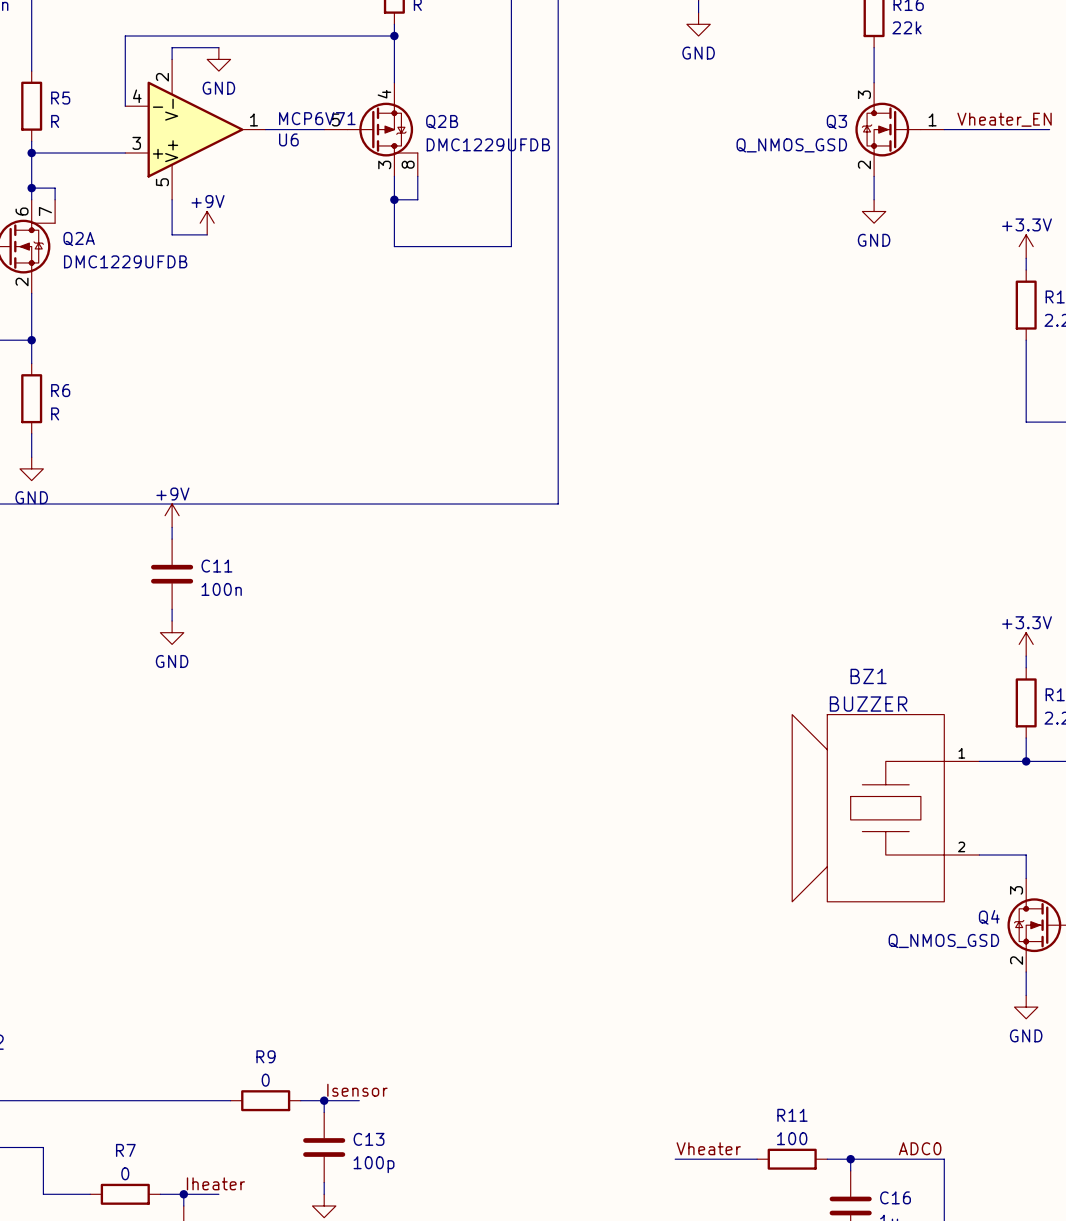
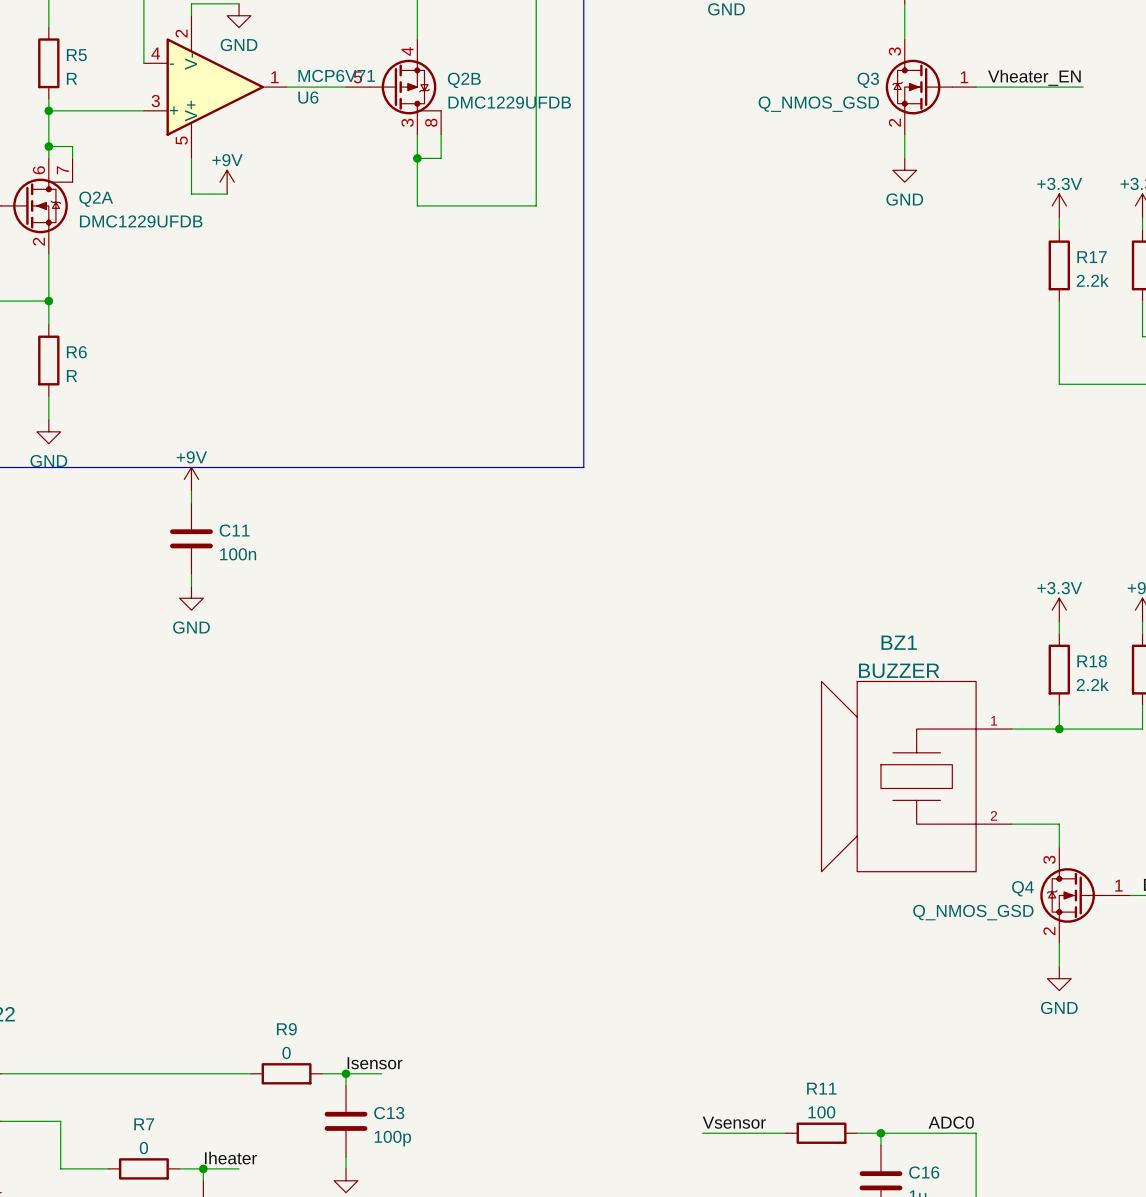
label: Vheater (708, 1148) -> Vsensor (734, 1122)

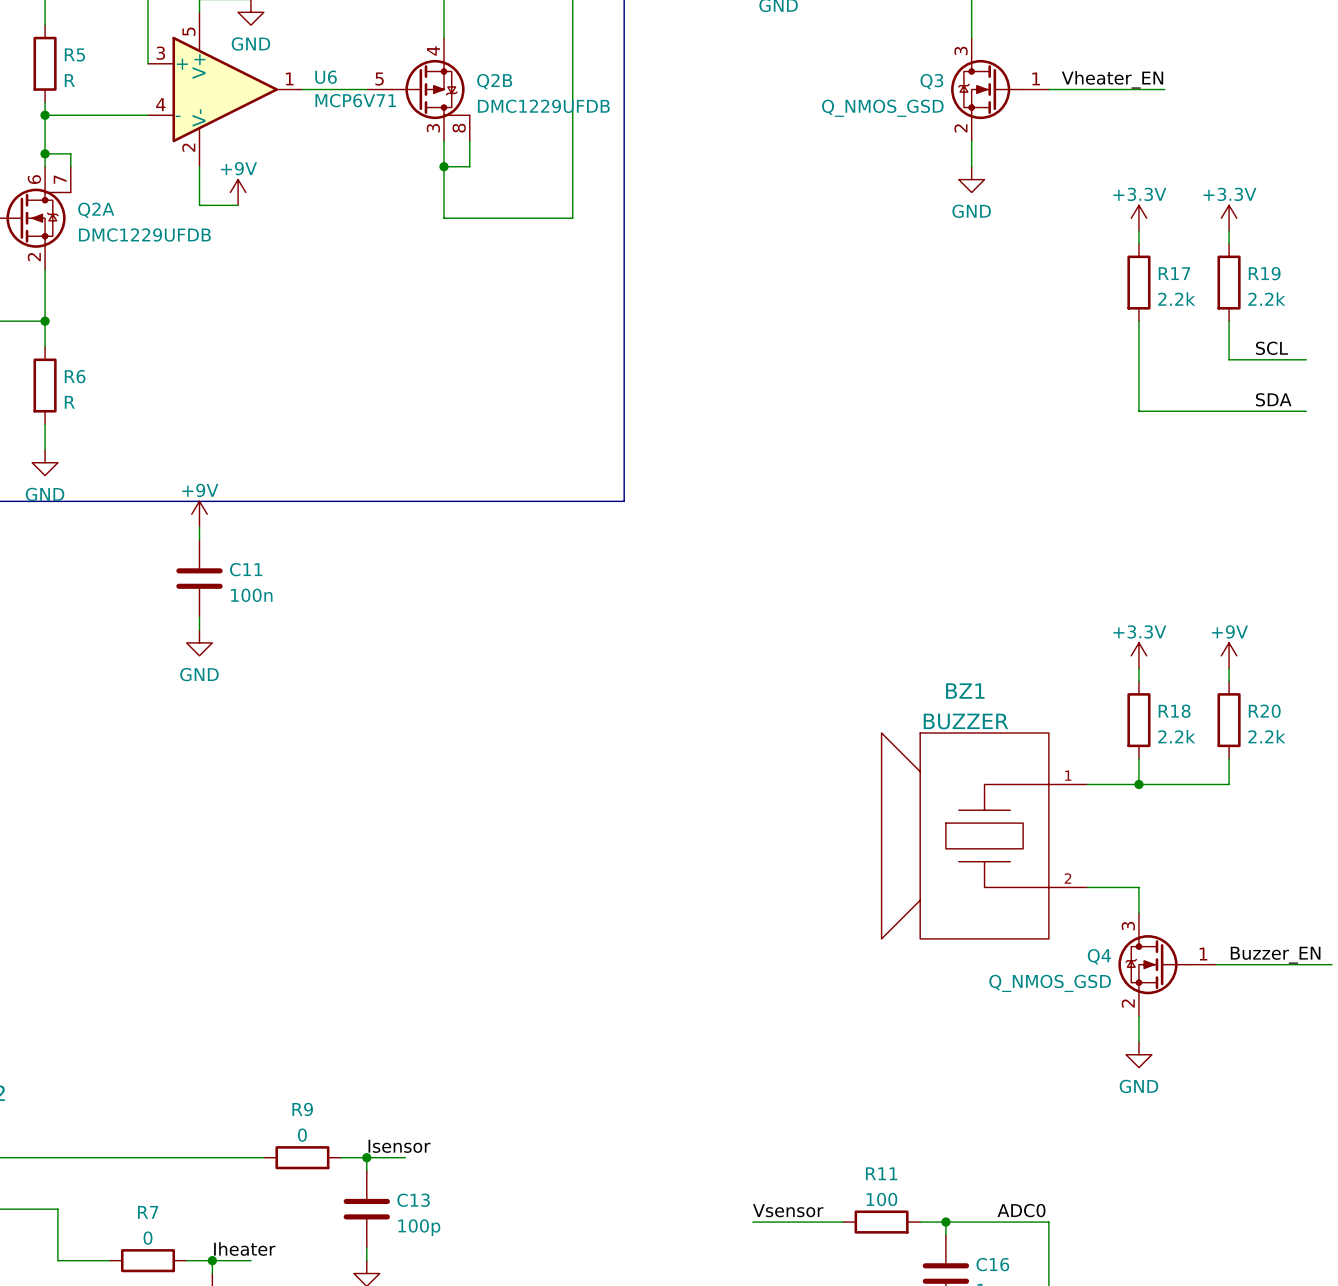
U6 flip: as is (215, 87) -> up-down (225, 89)

